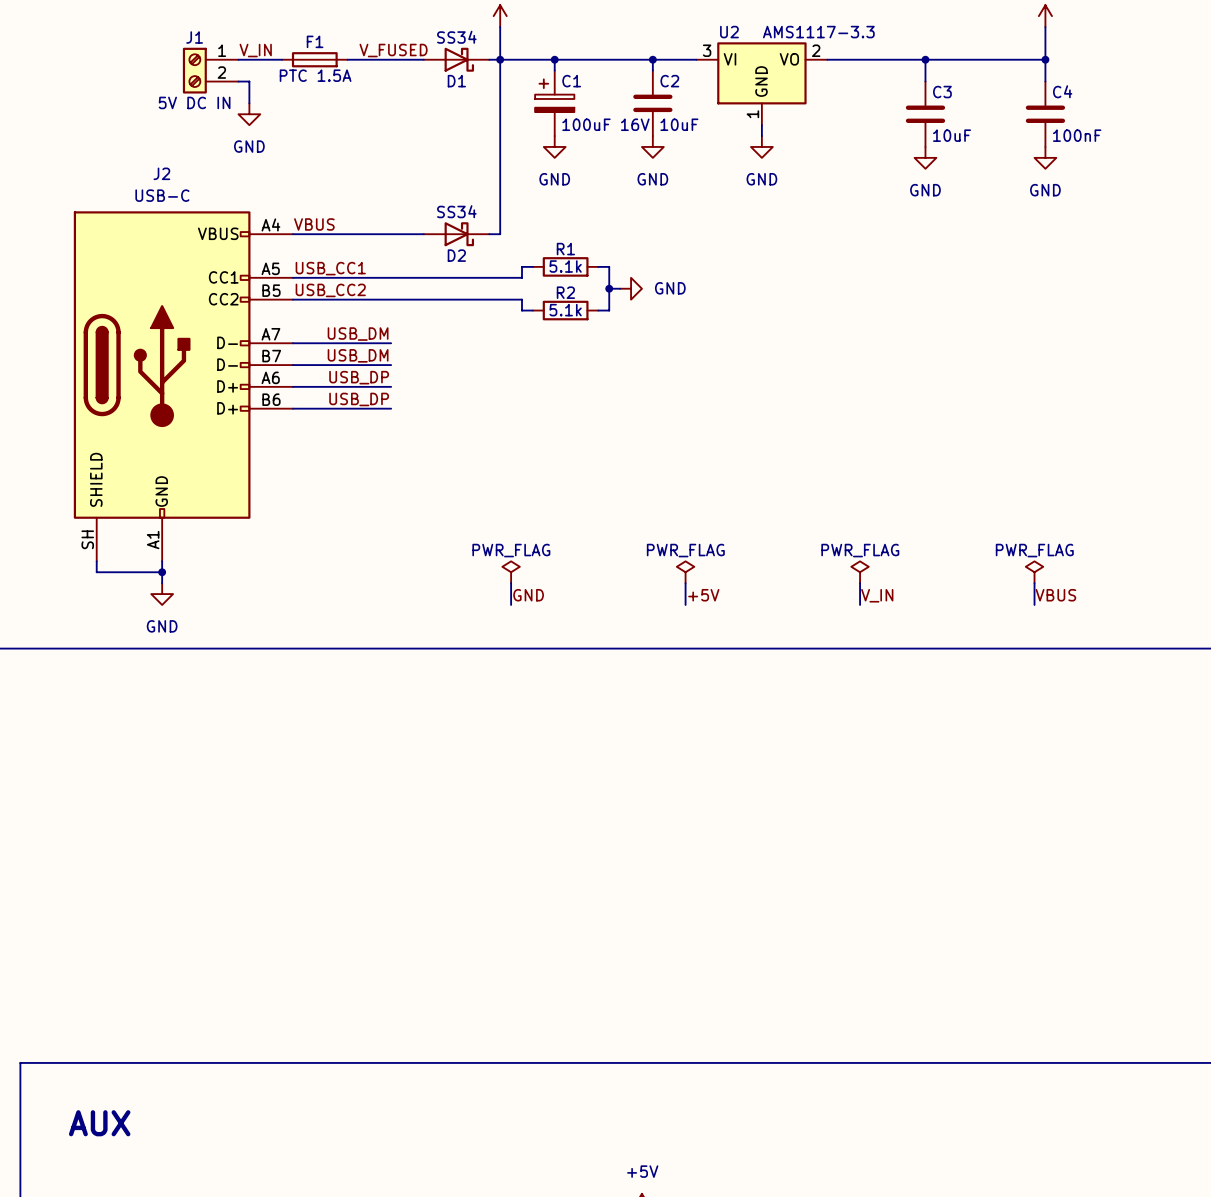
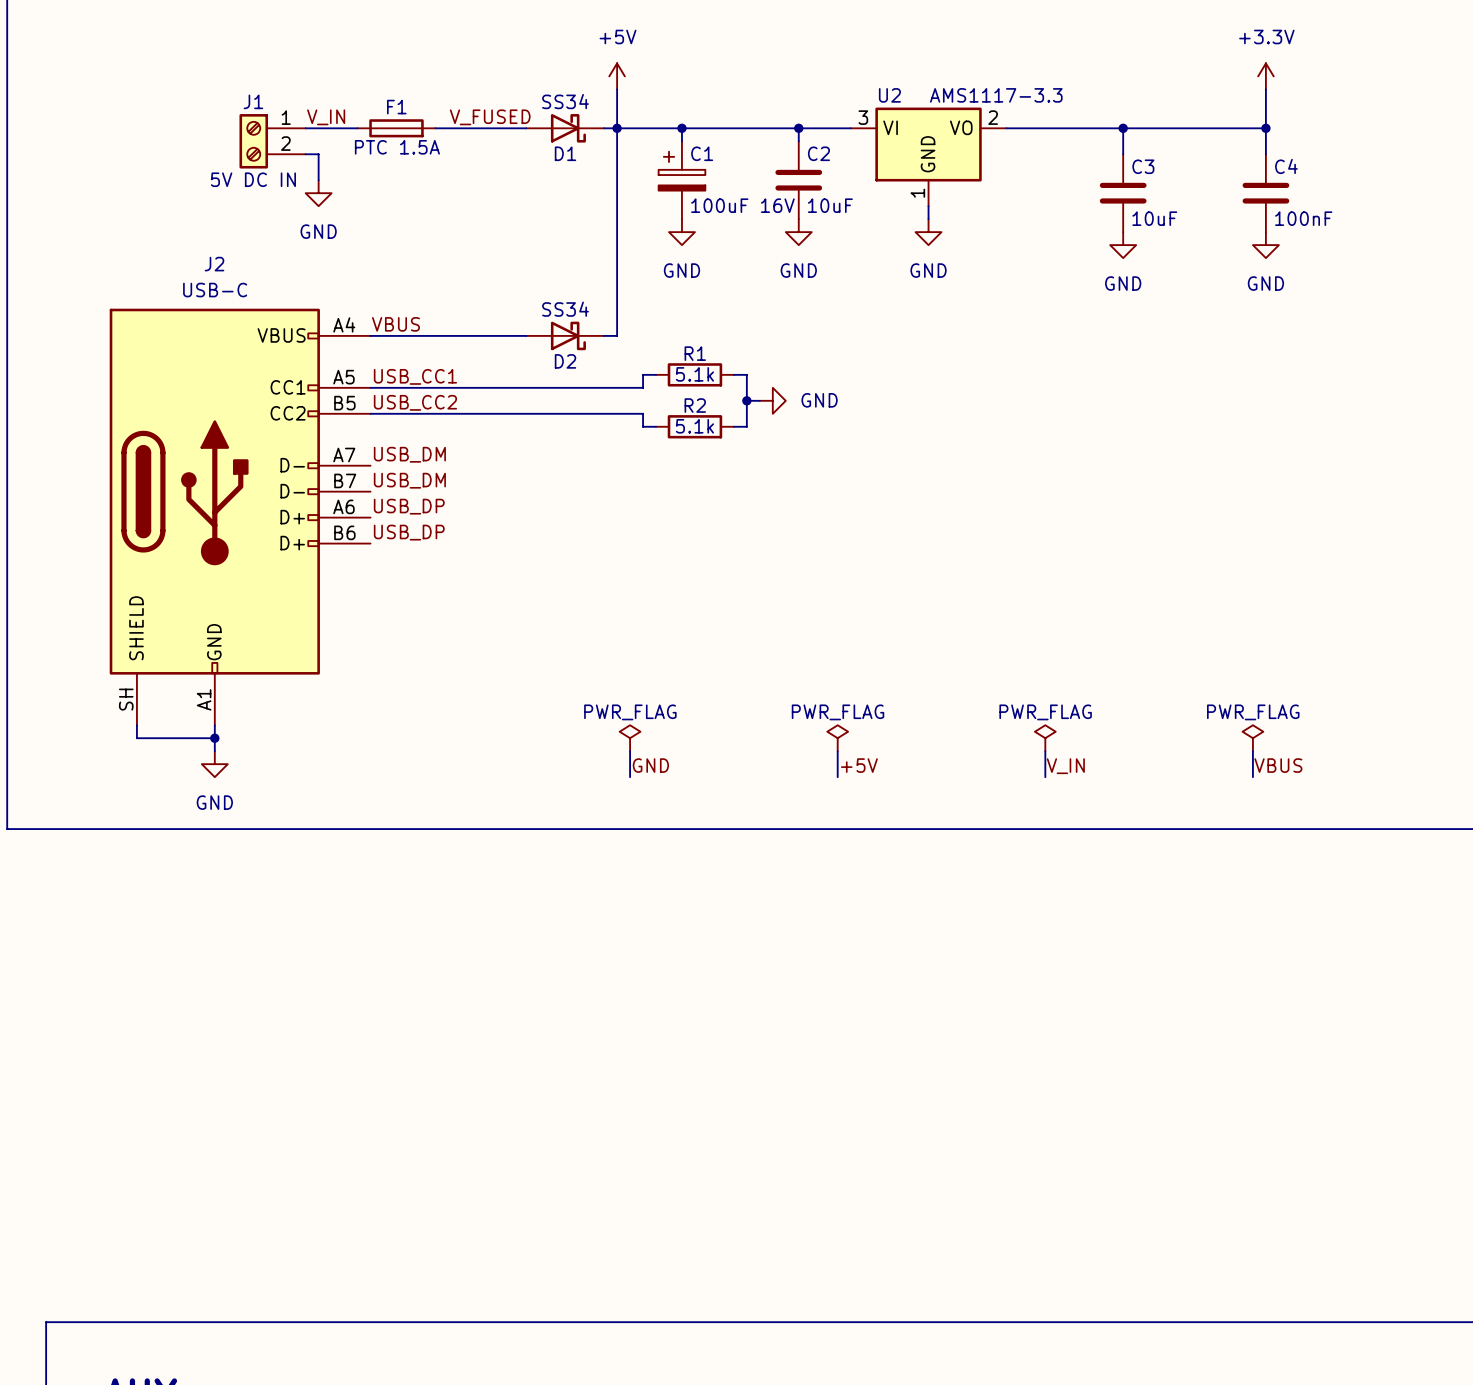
label: none -> USB_DM (409, 454)
label: USB_DM (358, 334) -> none
wire: (293, 343) (391, 343) -> none
label: none -> USB_DM (409, 480)
label: USB_DM (358, 355) -> none
wire: (293, 365) (391, 365) -> none
label: none -> USB_DP (409, 506)
label: USB_DP (359, 377) -> none
wire: (293, 386) (391, 386) -> none
label: none -> USB_DP (409, 532)
label: USB_DP (359, 399) -> none
wire: (293, 408) (391, 408) -> none

